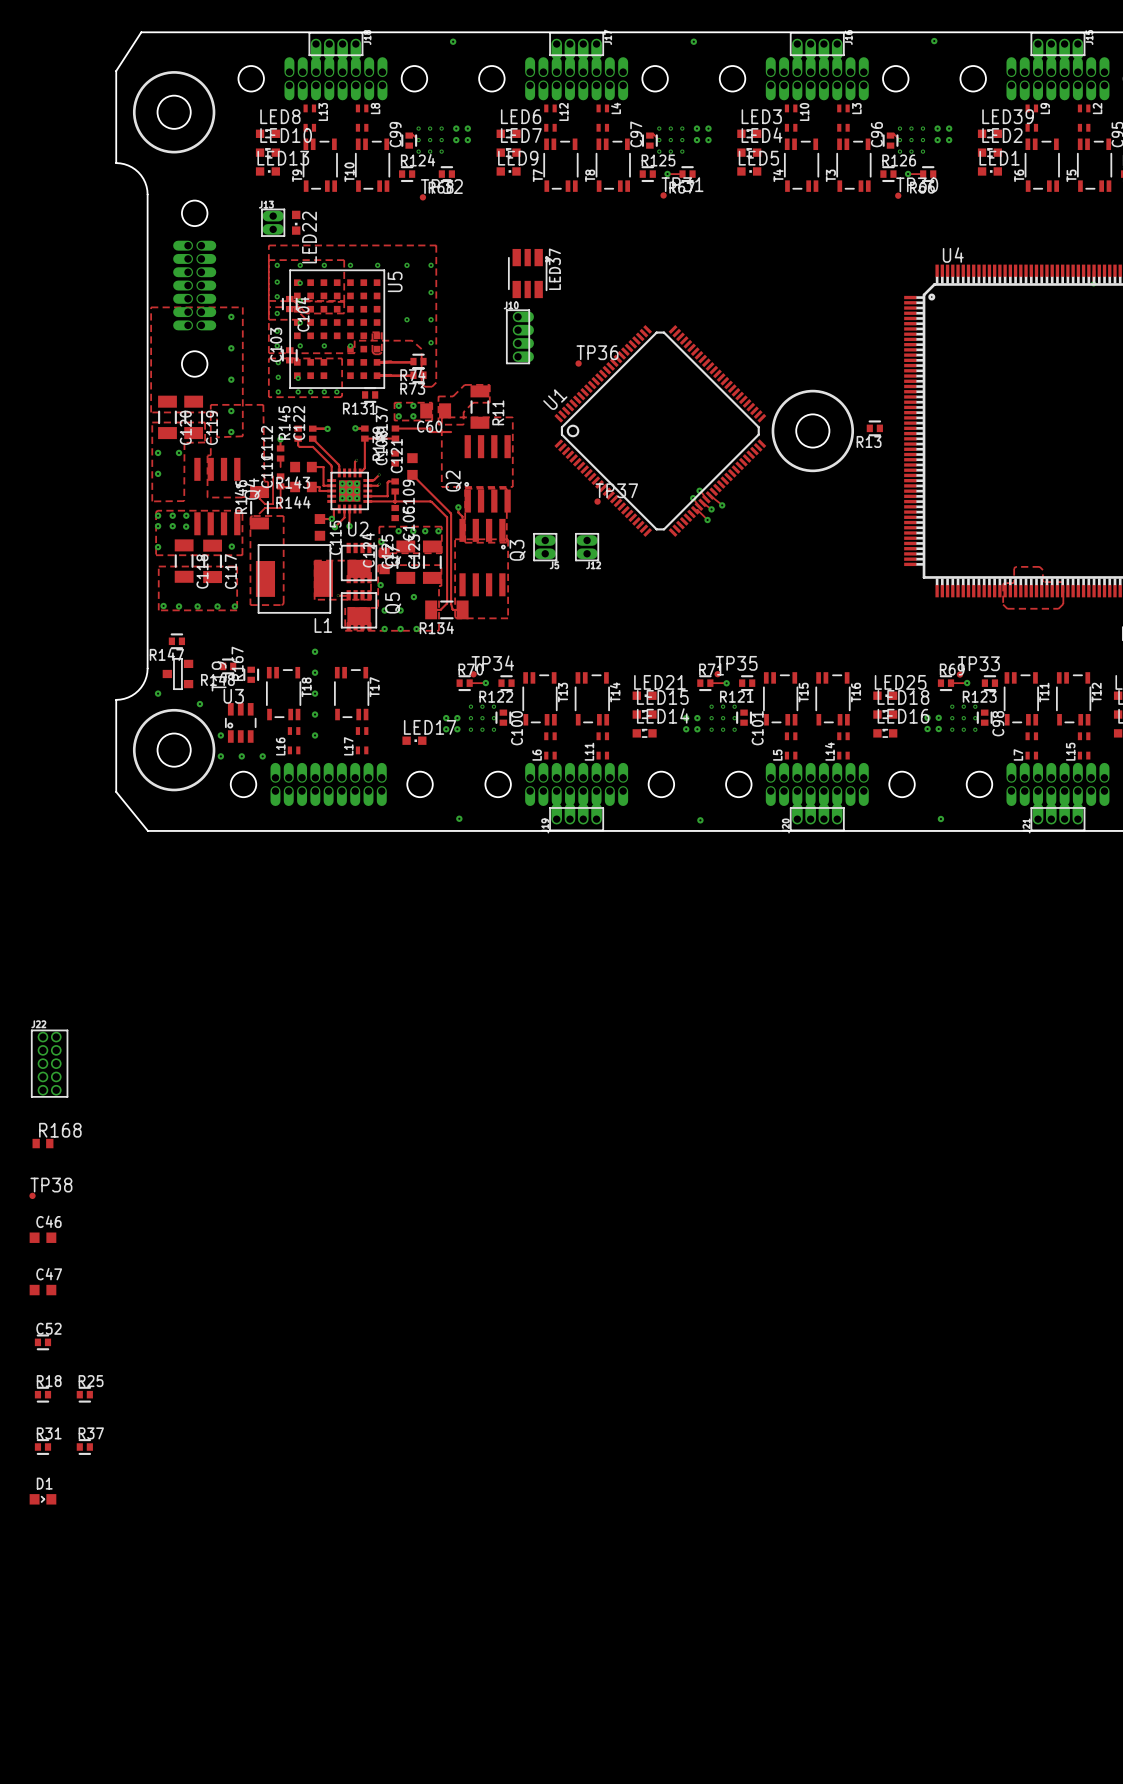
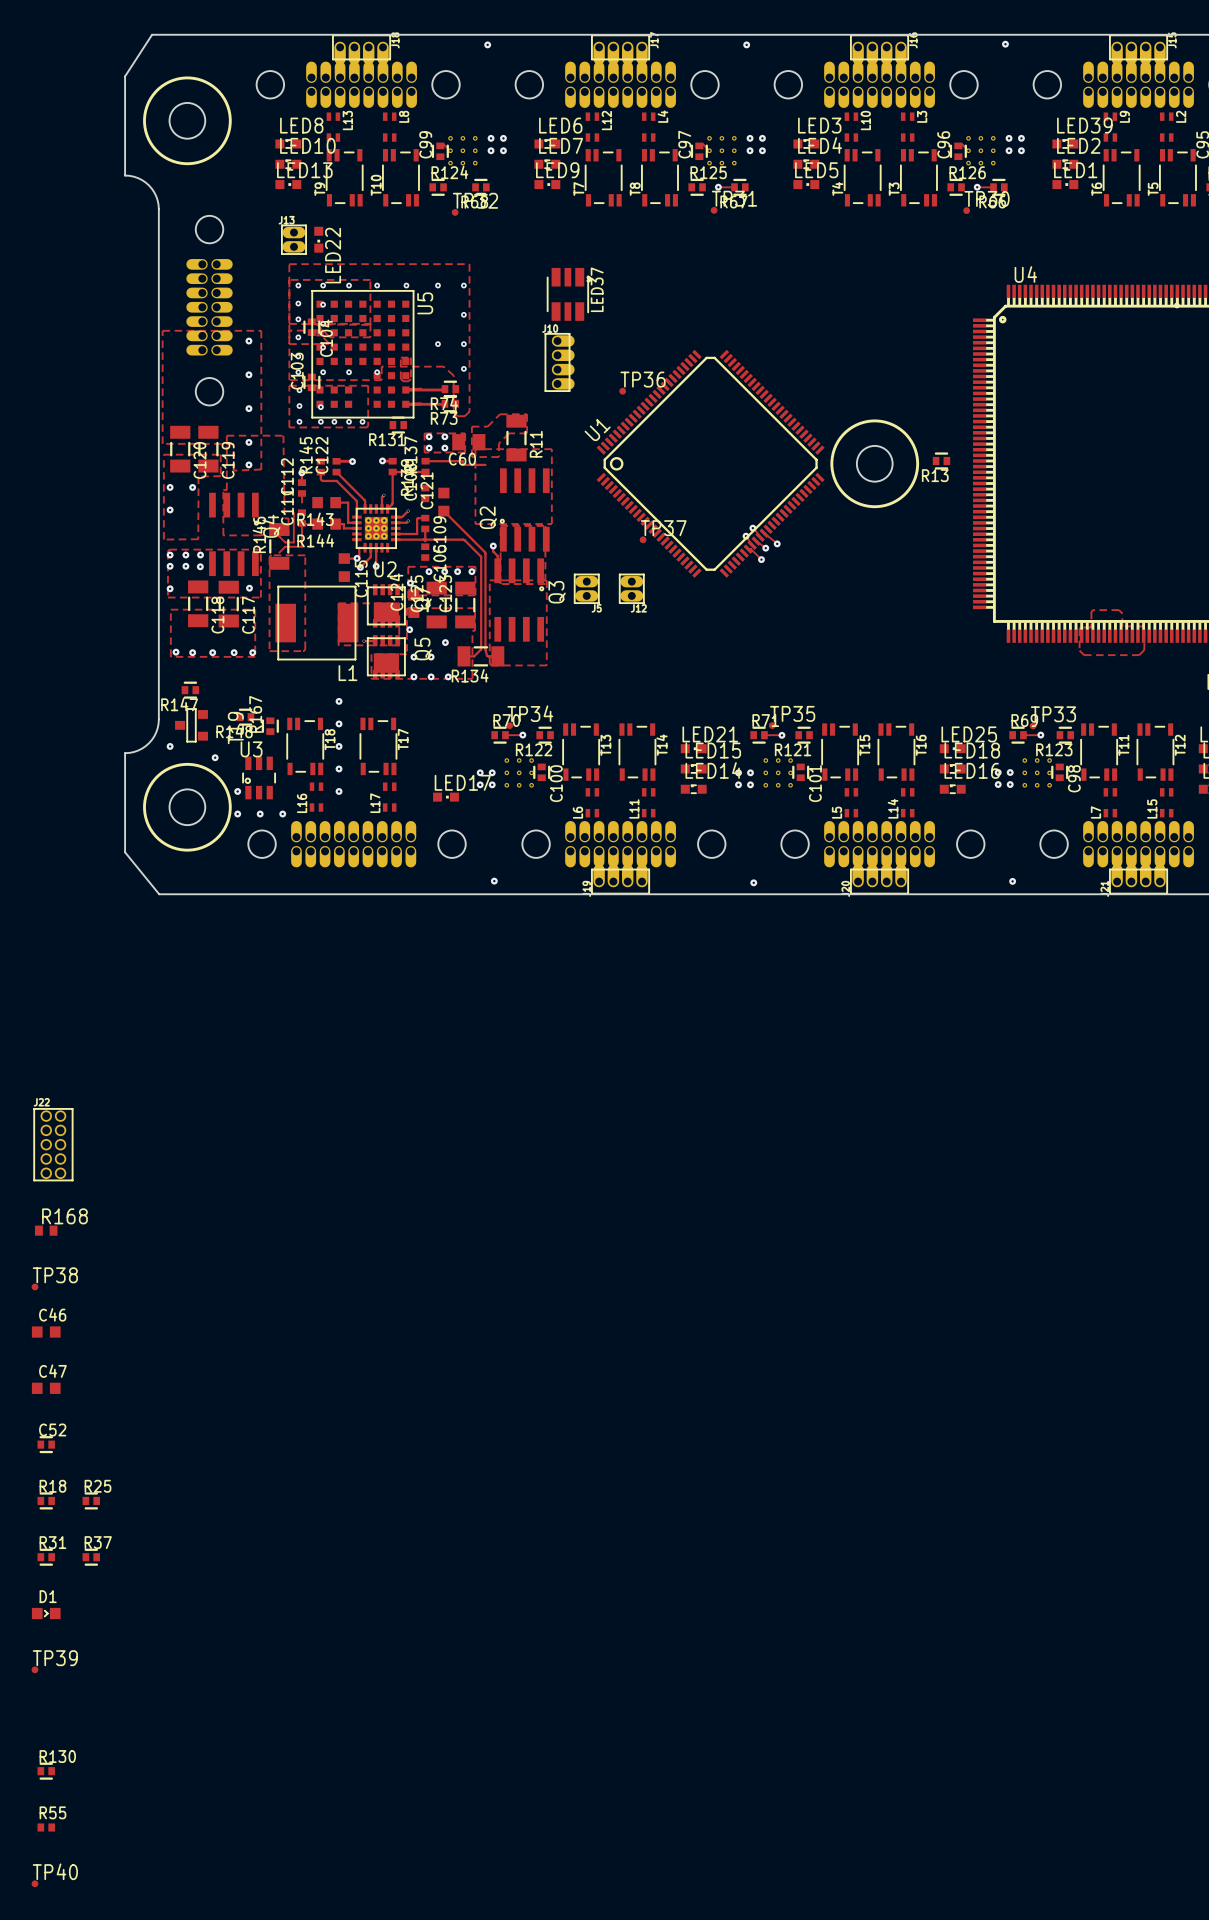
TP39: none -> (34, 1669)
R130: none -> (46, 1771)
R55: none -> (46, 1827)
TP40: none -> (34, 1883)

